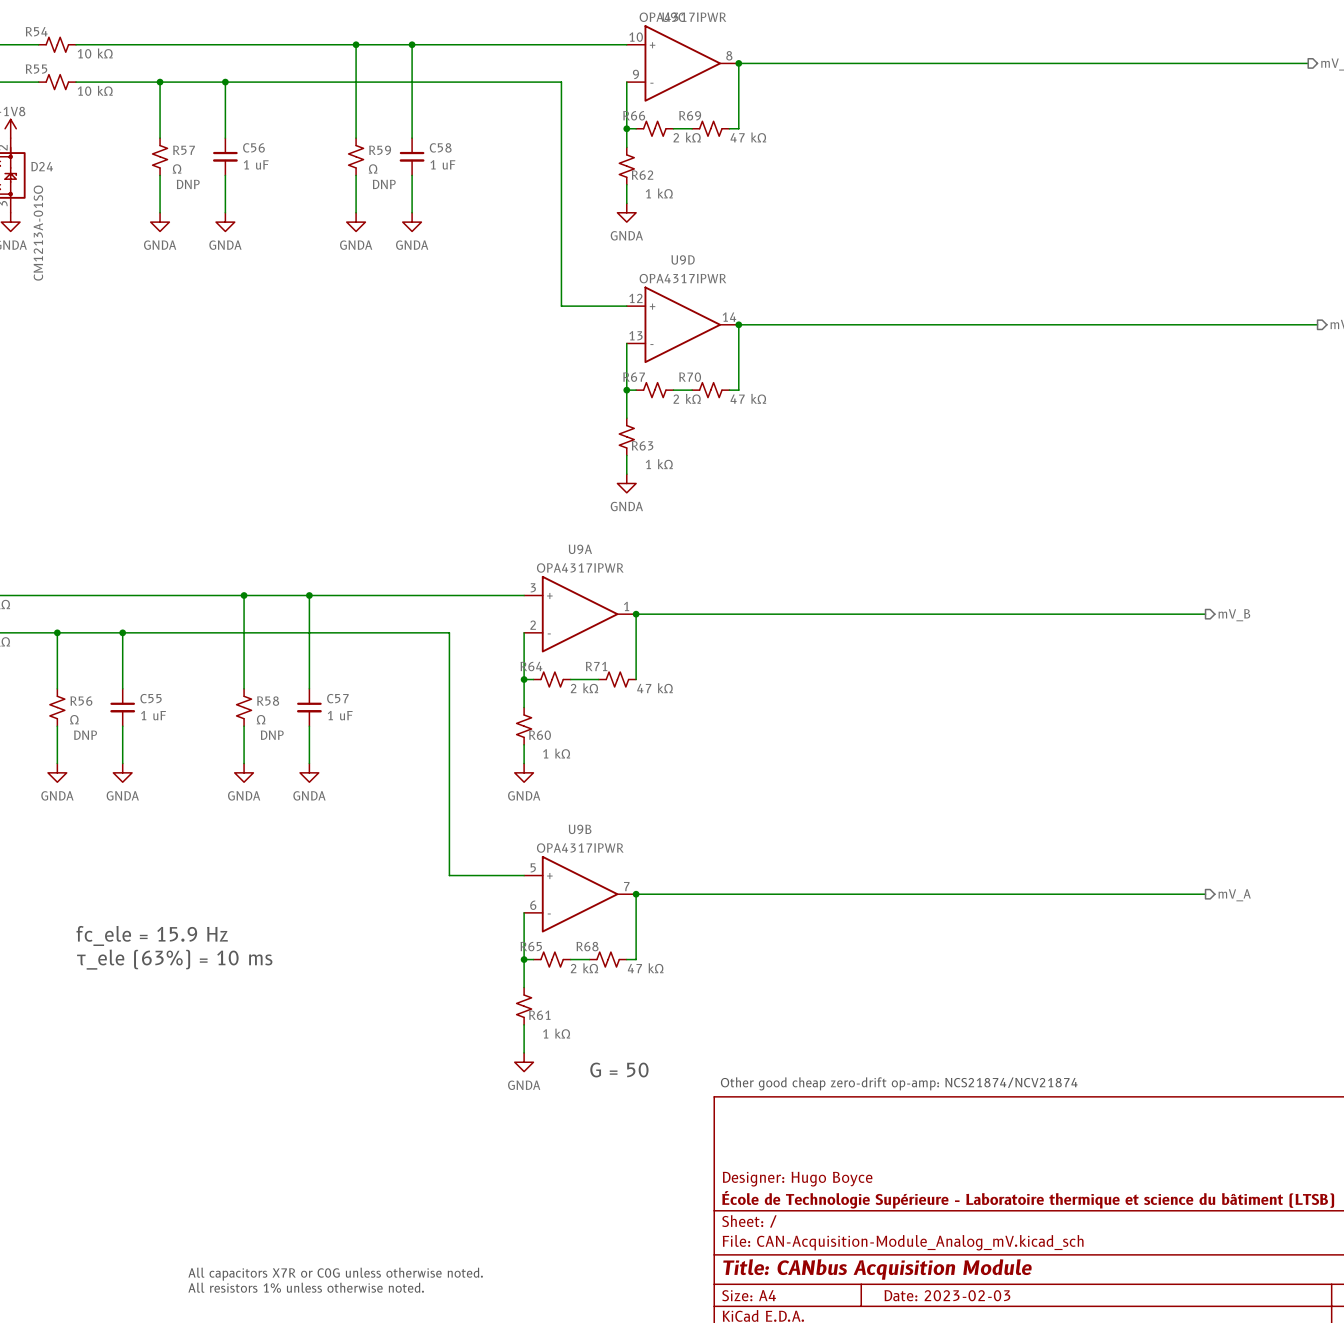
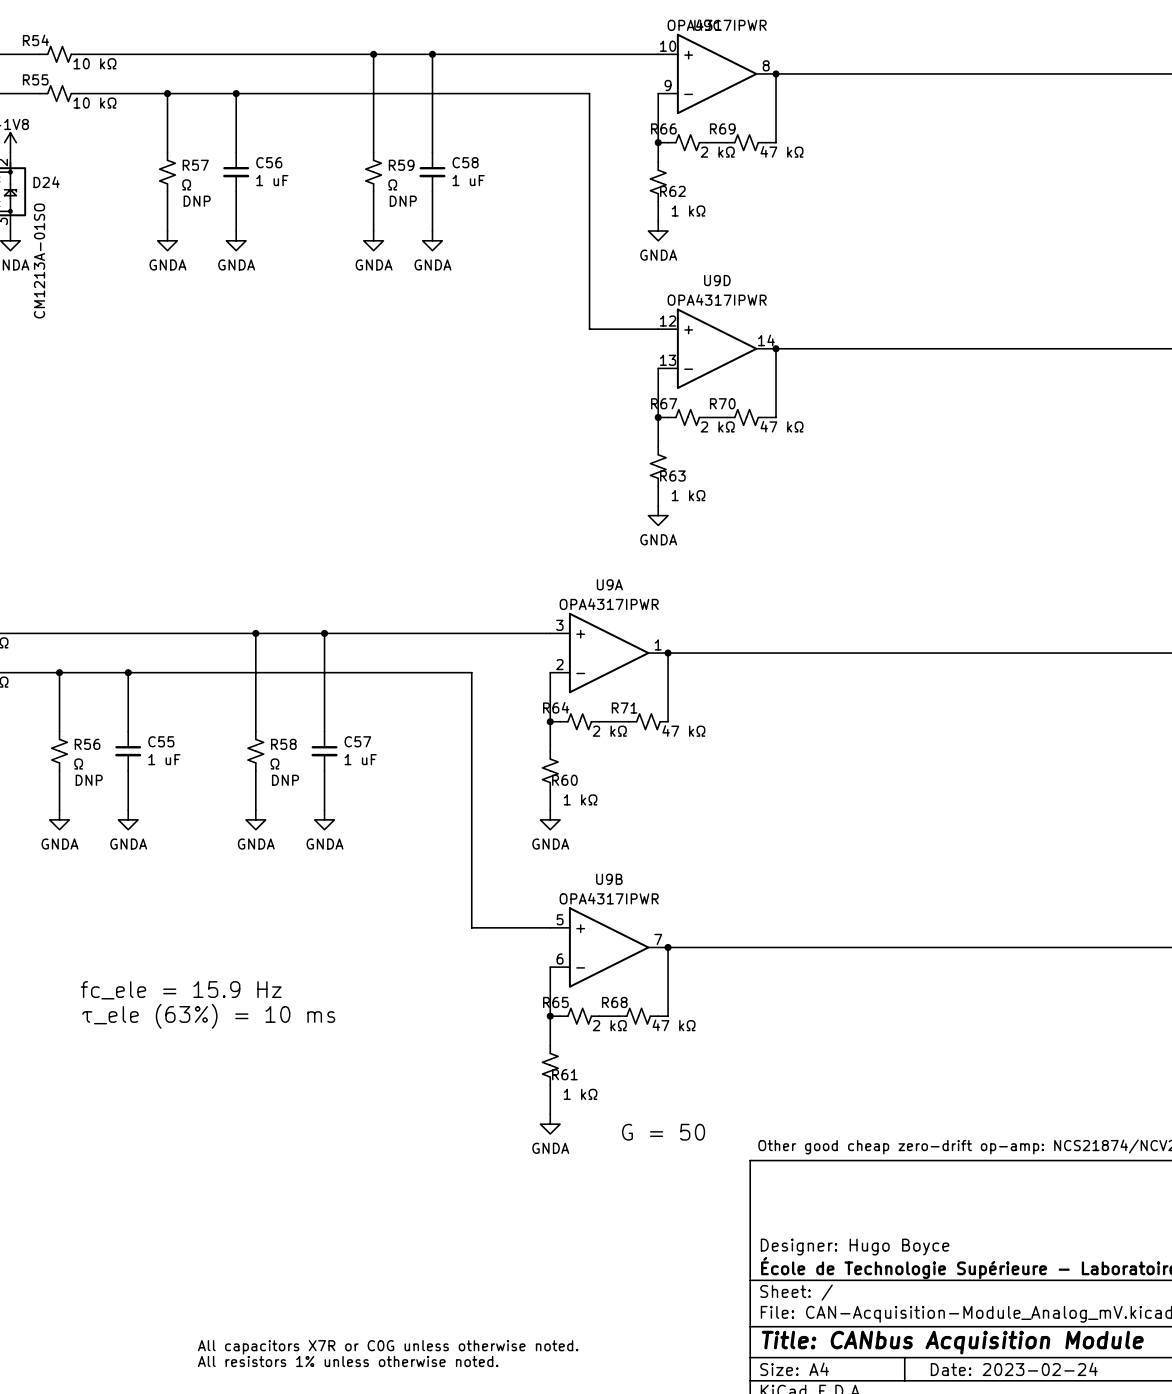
title block: Date: 2023-02-03 (947, 1295) -> Date: 2023-02-24 (1014, 1369)

